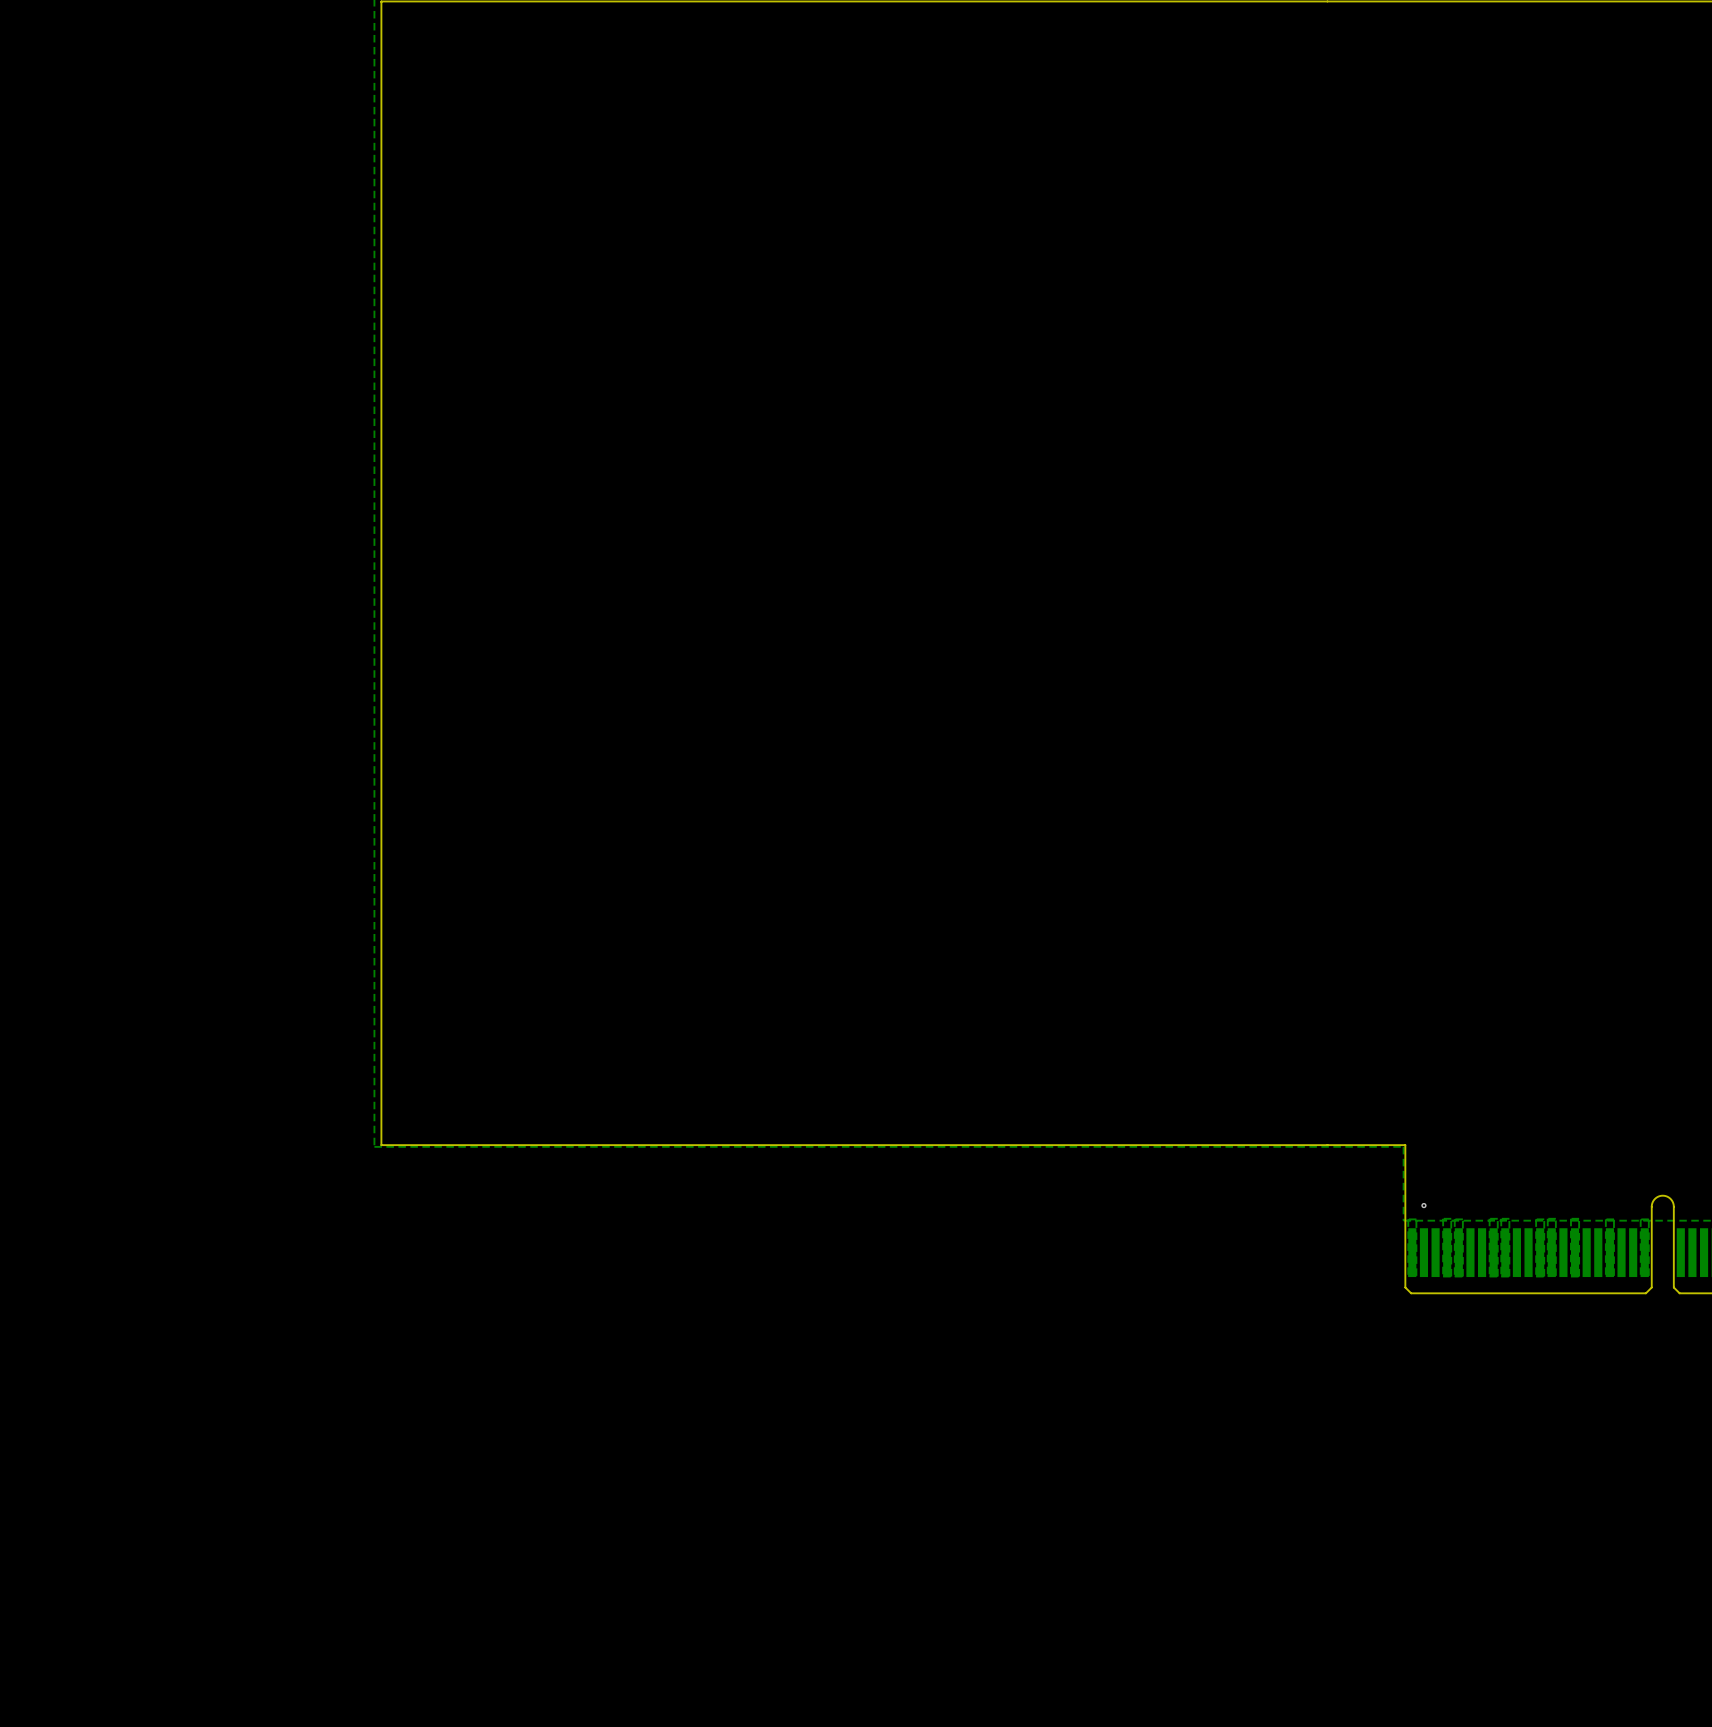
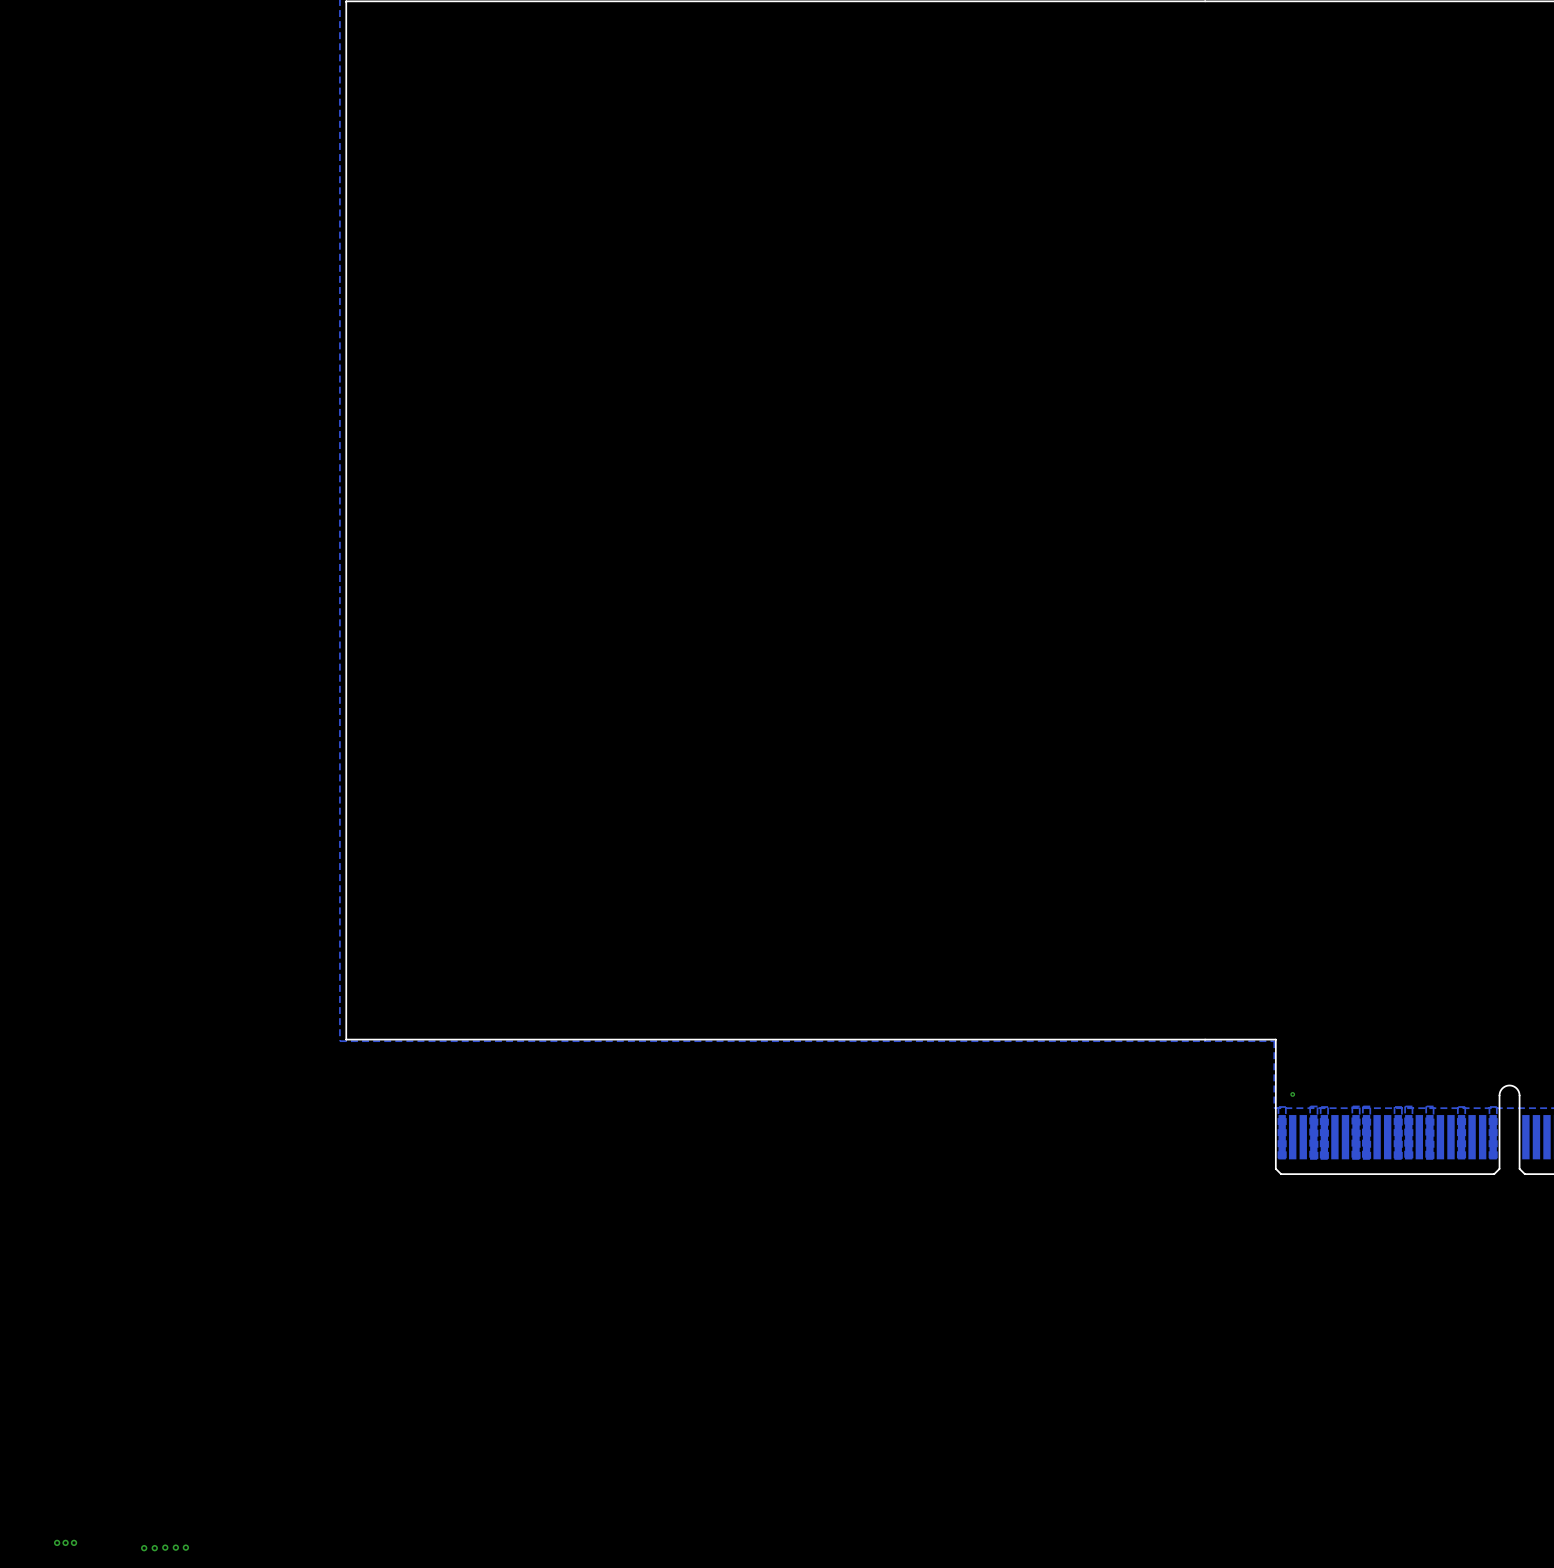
via: none -> (57, 1542)
via: none -> (65, 1542)
via: none -> (74, 1542)
via: none -> (165, 1547)
via: none -> (175, 1547)
via: none -> (185, 1547)
via: none -> (144, 1548)
via: none -> (154, 1548)

